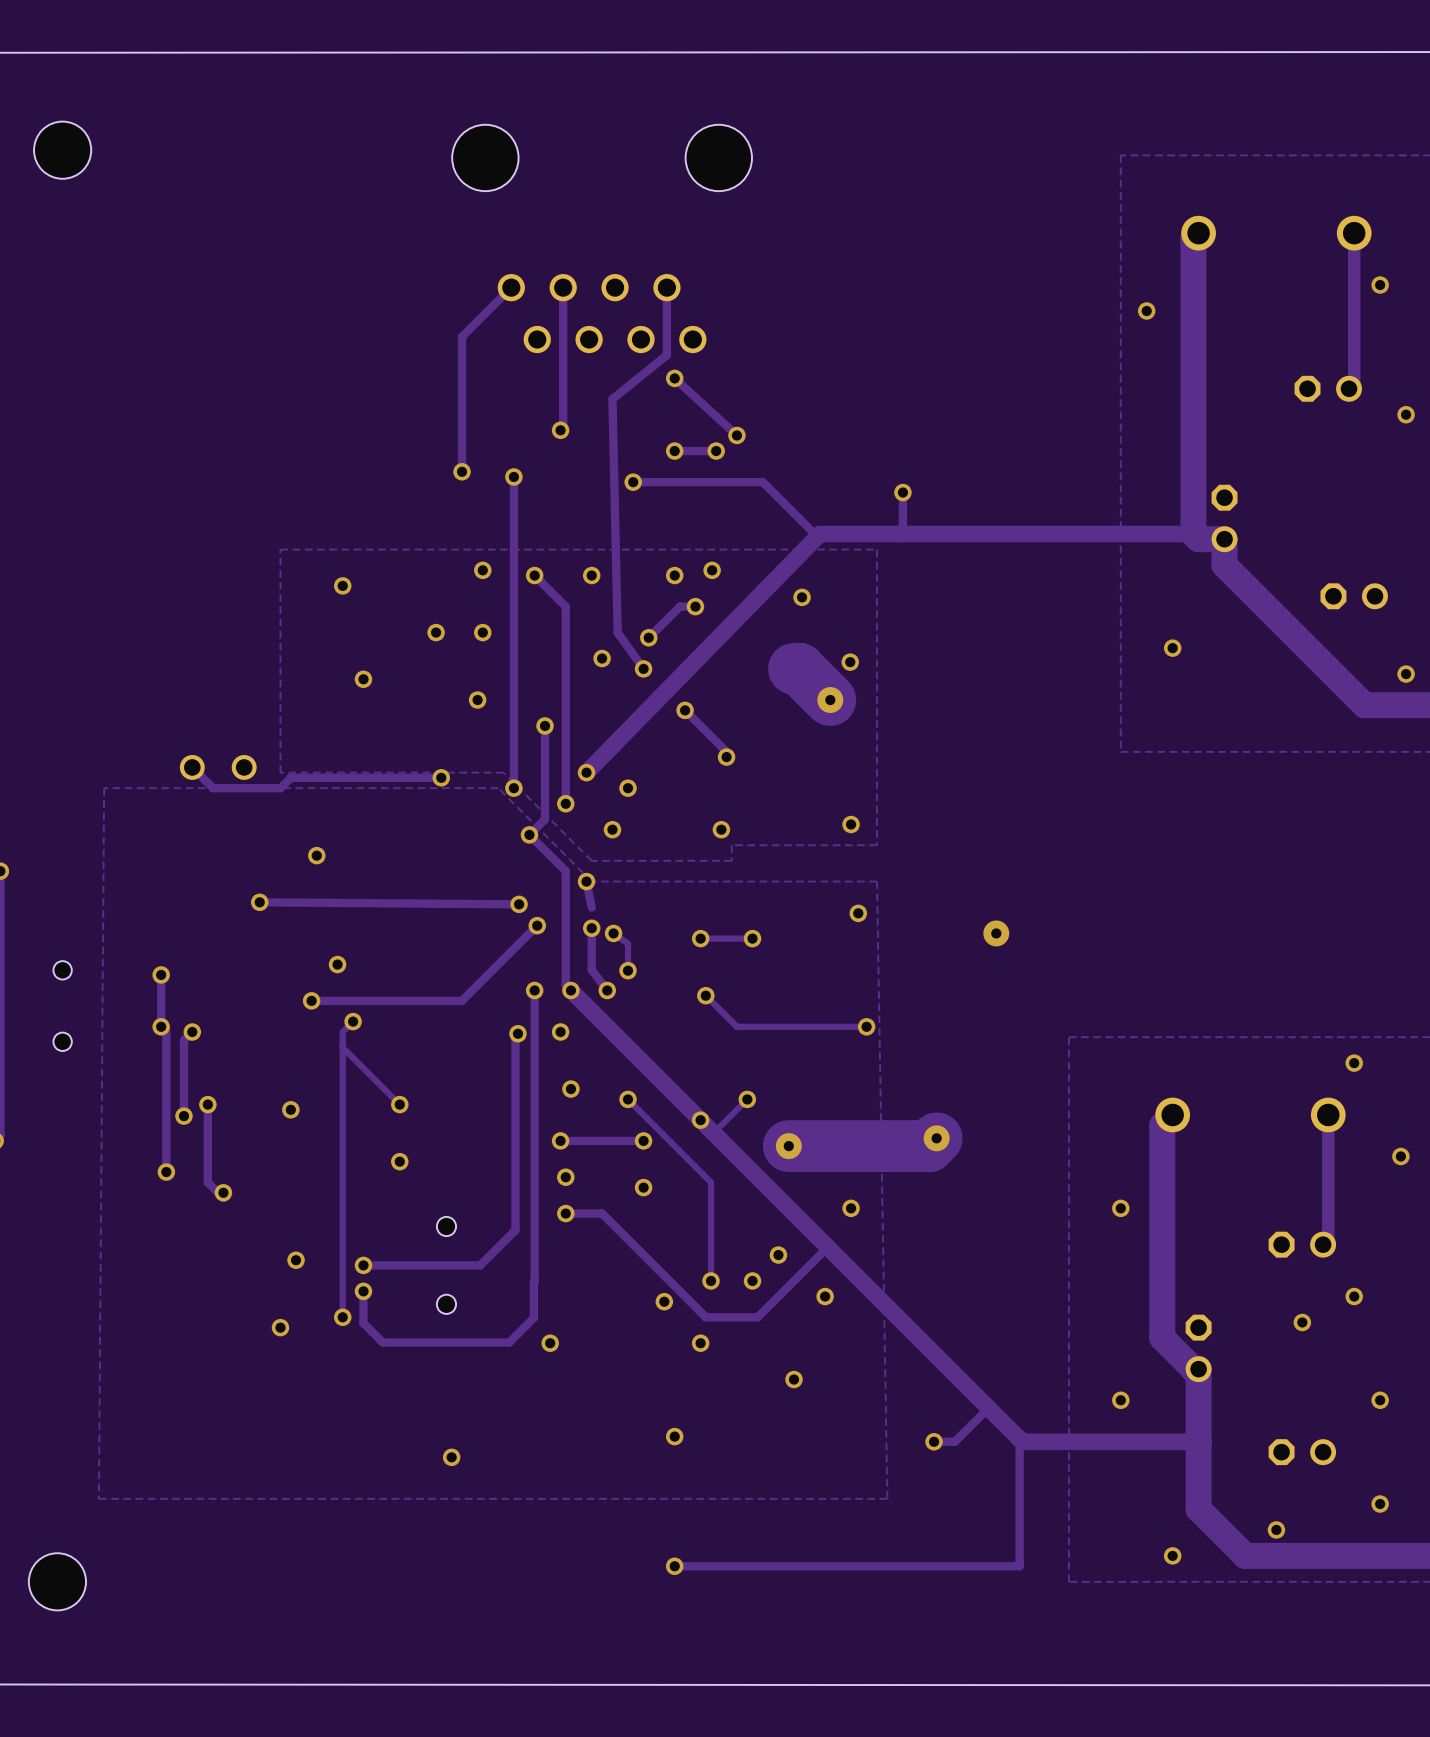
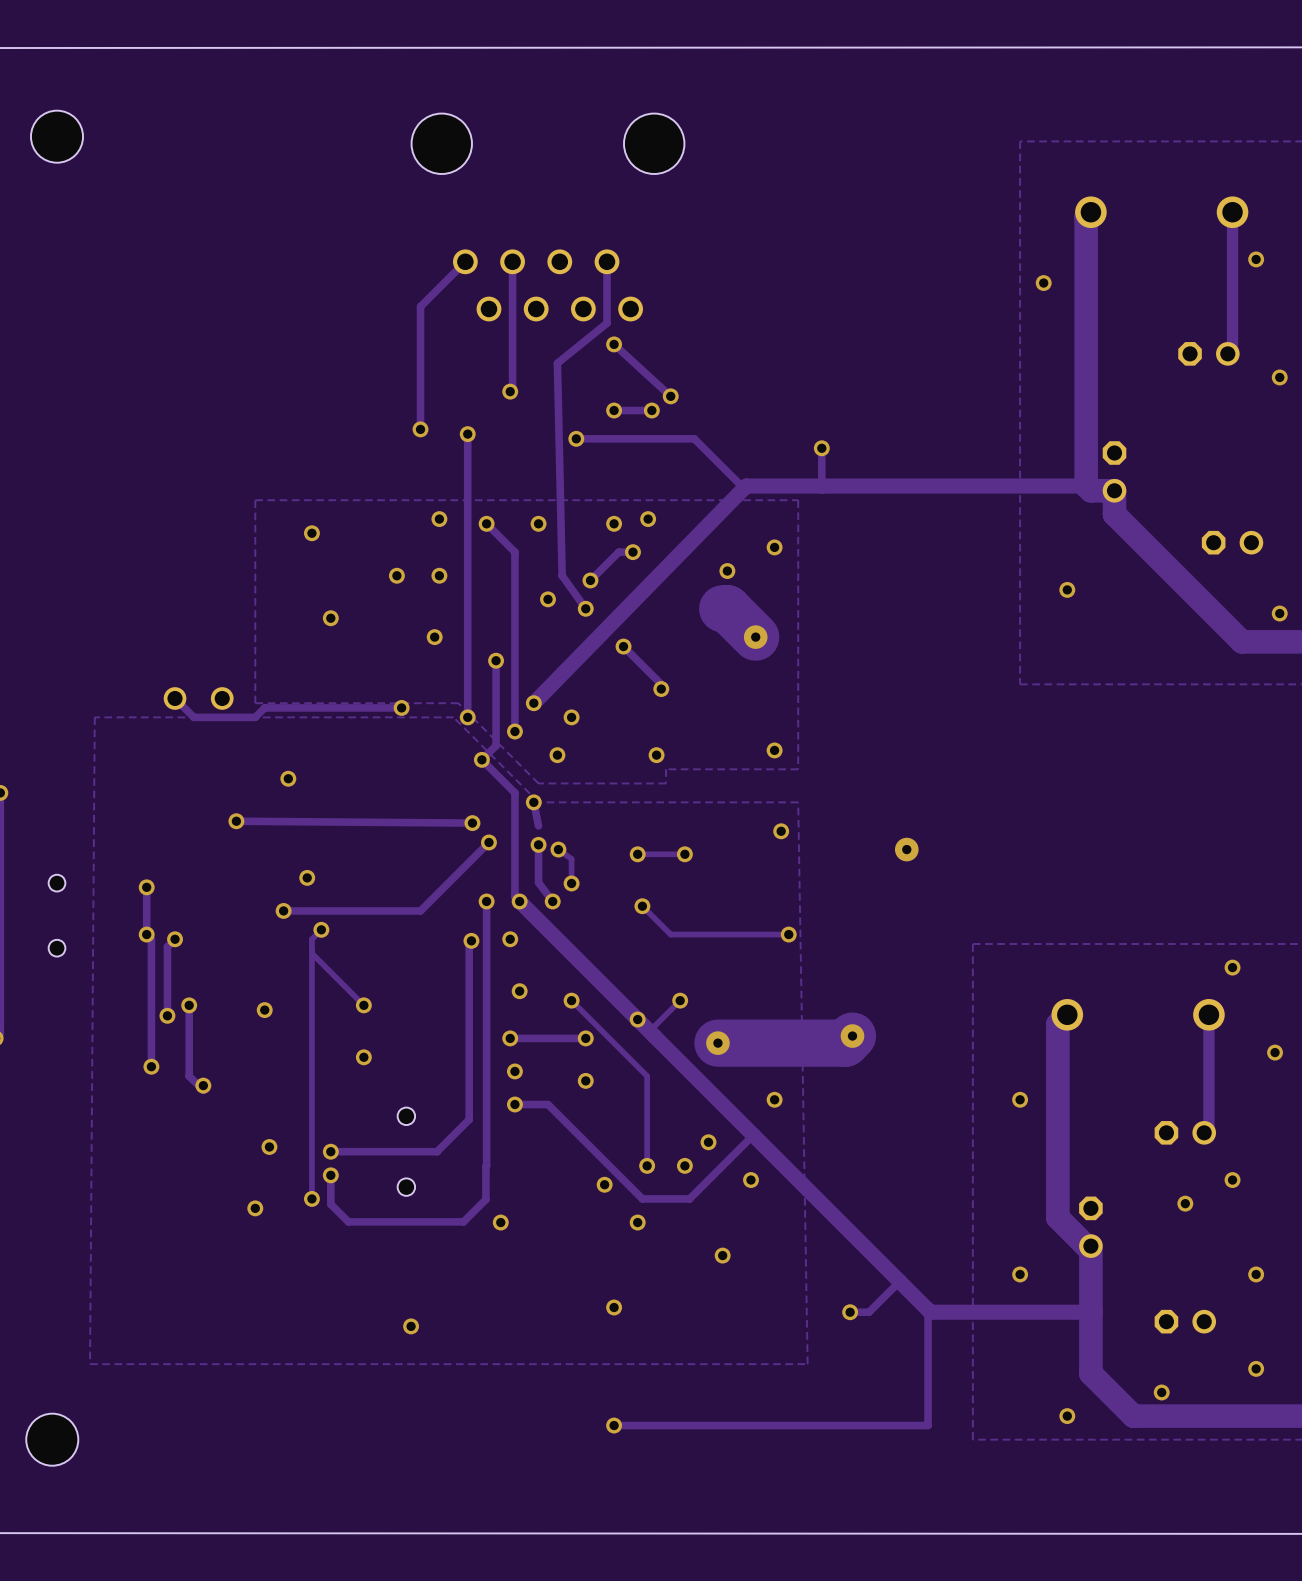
via: (802, 597) -> none
via: none -> (774, 547)
via: none -> (727, 571)
via: (850, 662) -> none

